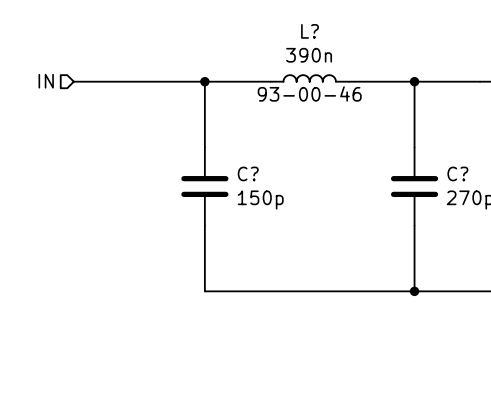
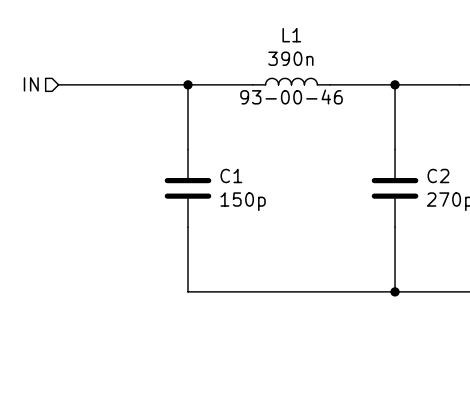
L? name: L? (310, 31) -> L1 (291, 35)
C? name: C? (248, 173) -> C1 (231, 175)
C? name: C? (457, 173) -> C2 (438, 175)

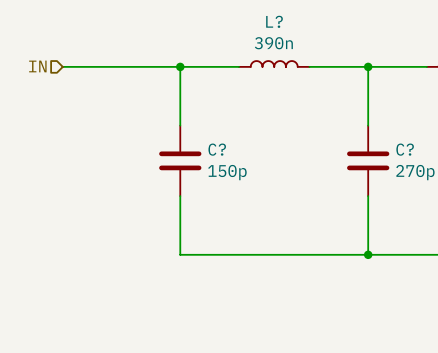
L1 name: L1 (291, 35) -> L? (274, 21)
L1 text: 93-00-46 (291, 97) -> none
C1 name: C1 (231, 175) -> C? (217, 149)
C2 name: C2 (438, 175) -> C? (405, 149)

